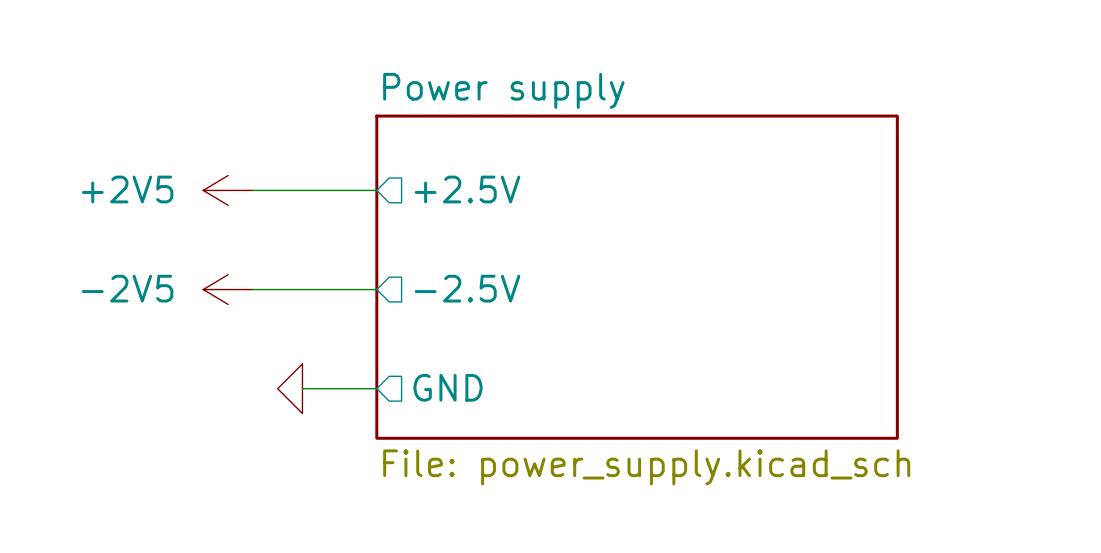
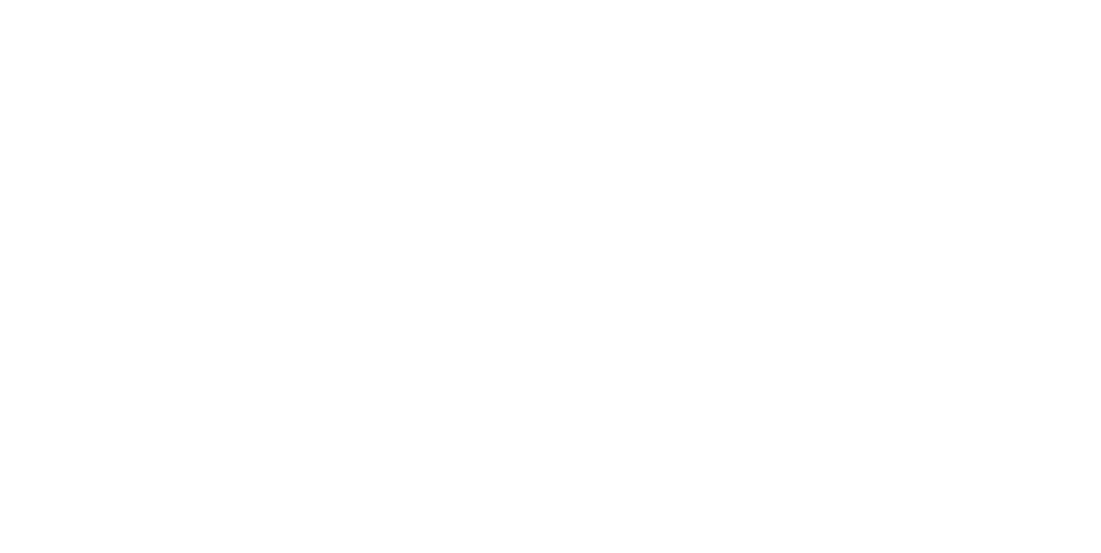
sheet pin: +2.5V (467, 189) -> none
power symbol: +2V5 (228, 190) -> none
wire: (252, 190) (376, 190) -> none
sheet Power supply: File: power_supply.kicad_sch (637, 277) -> none
sheet pin: -2.5V (467, 288) -> none
power symbol: -2V5 (228, 289) -> none
wire: (252, 289) (376, 289) -> none
sheet pin: GND (448, 387) -> none
power symbol: (290, 388) -> none
wire: (302, 388) (376, 388) -> none

